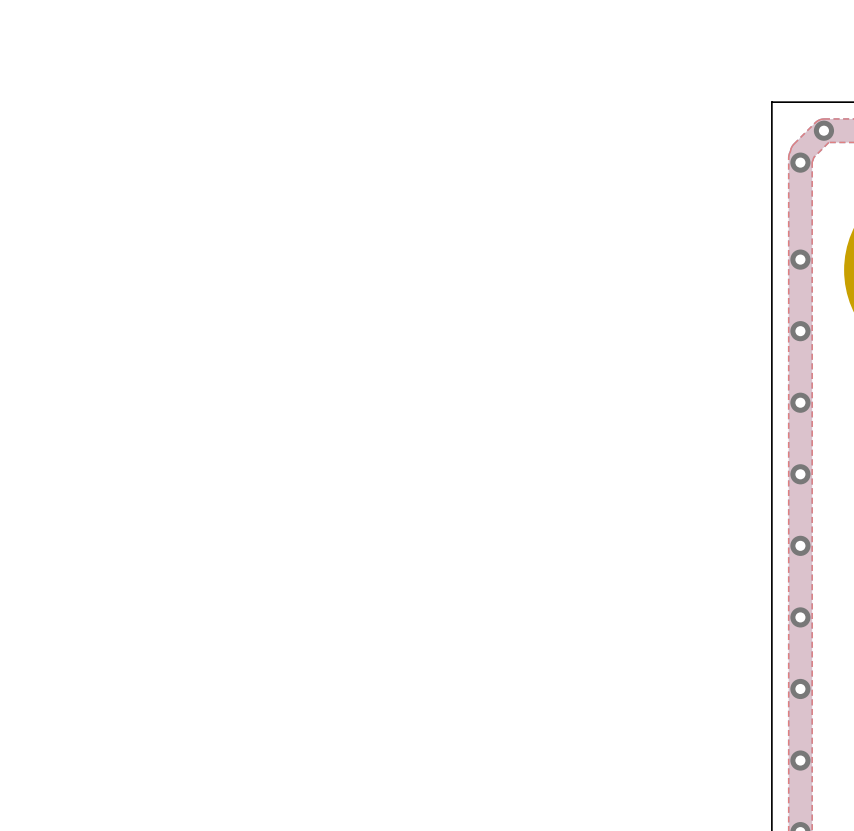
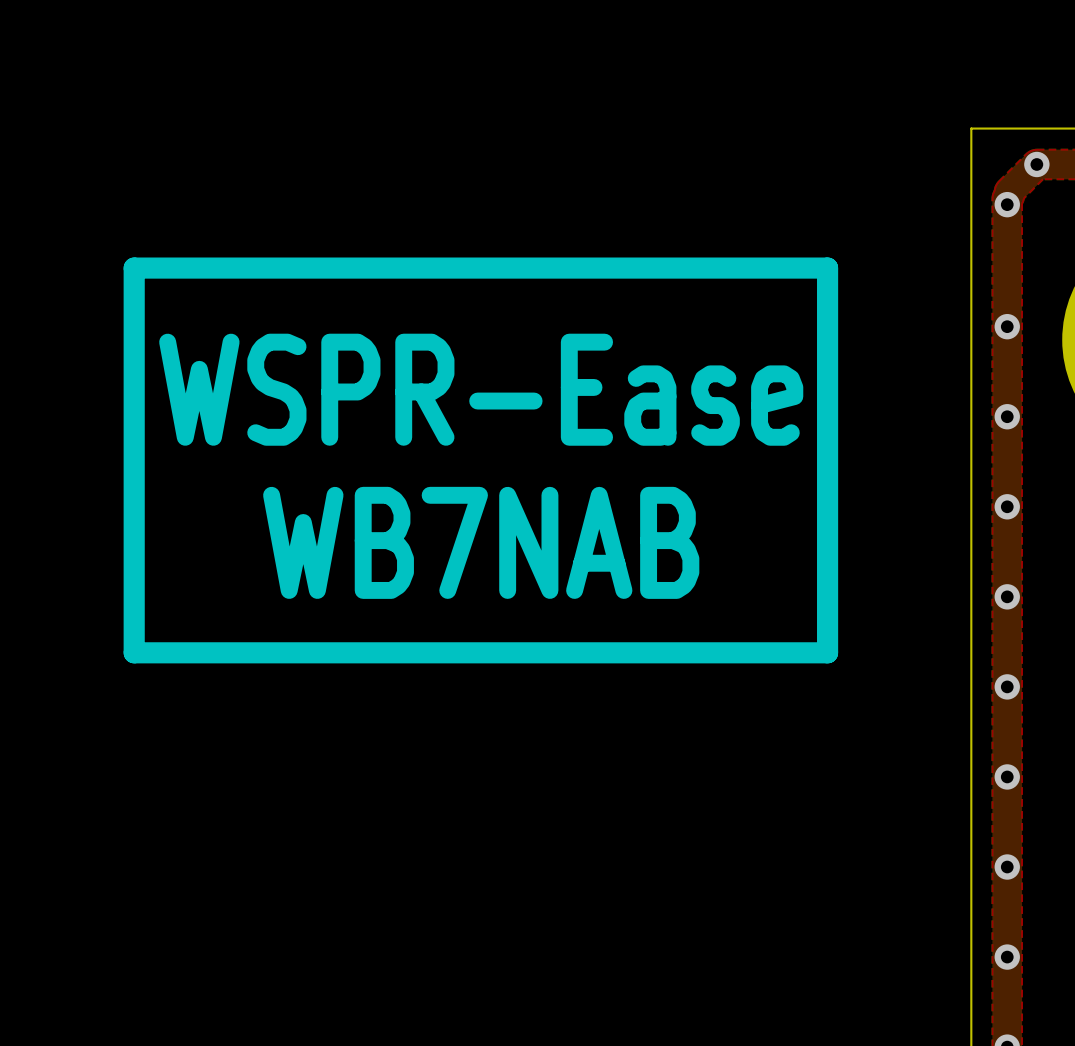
line: none -> (134, 268) (827, 268) (827, 652) (134, 652) (134, 268)
text: none -> WSPR-Ease (481, 389)
text: none -> WB7NAB (481, 542)

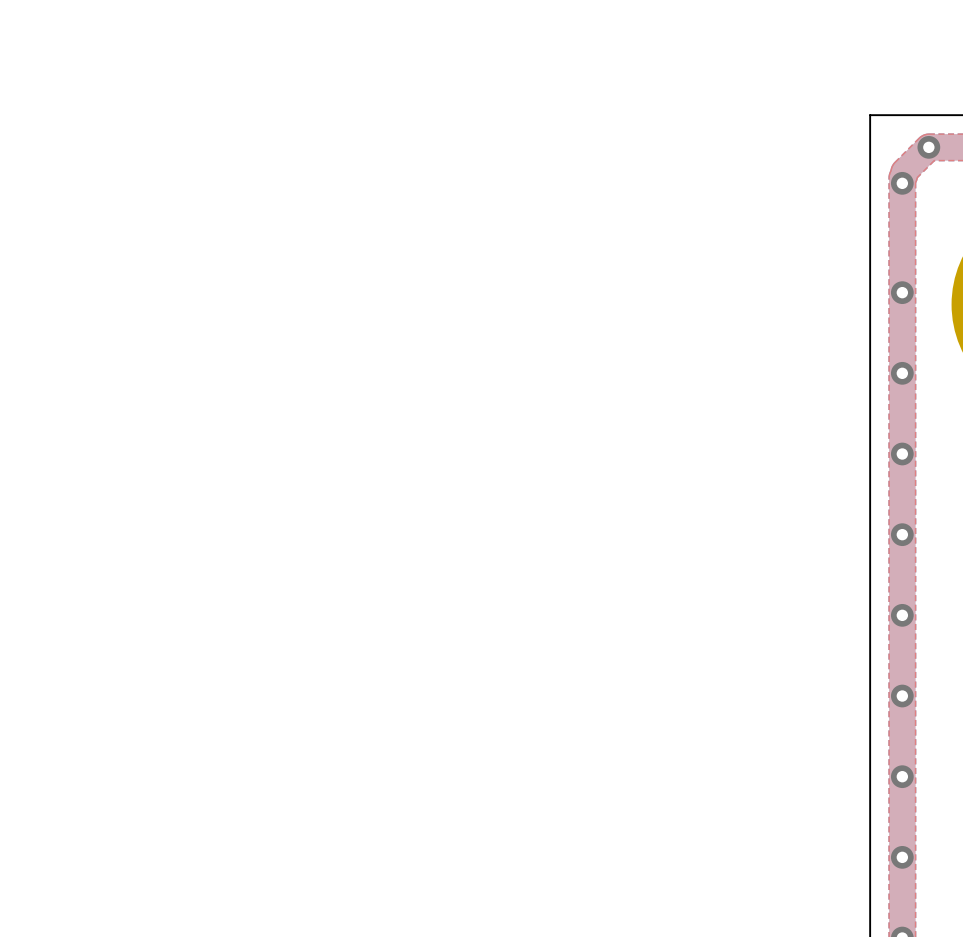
line: (134, 268) (827, 268) (827, 652) (134, 652) (134, 268) -> none
text: WSPR-Ease (481, 389) -> none
text: WB7NAB (481, 542) -> none

